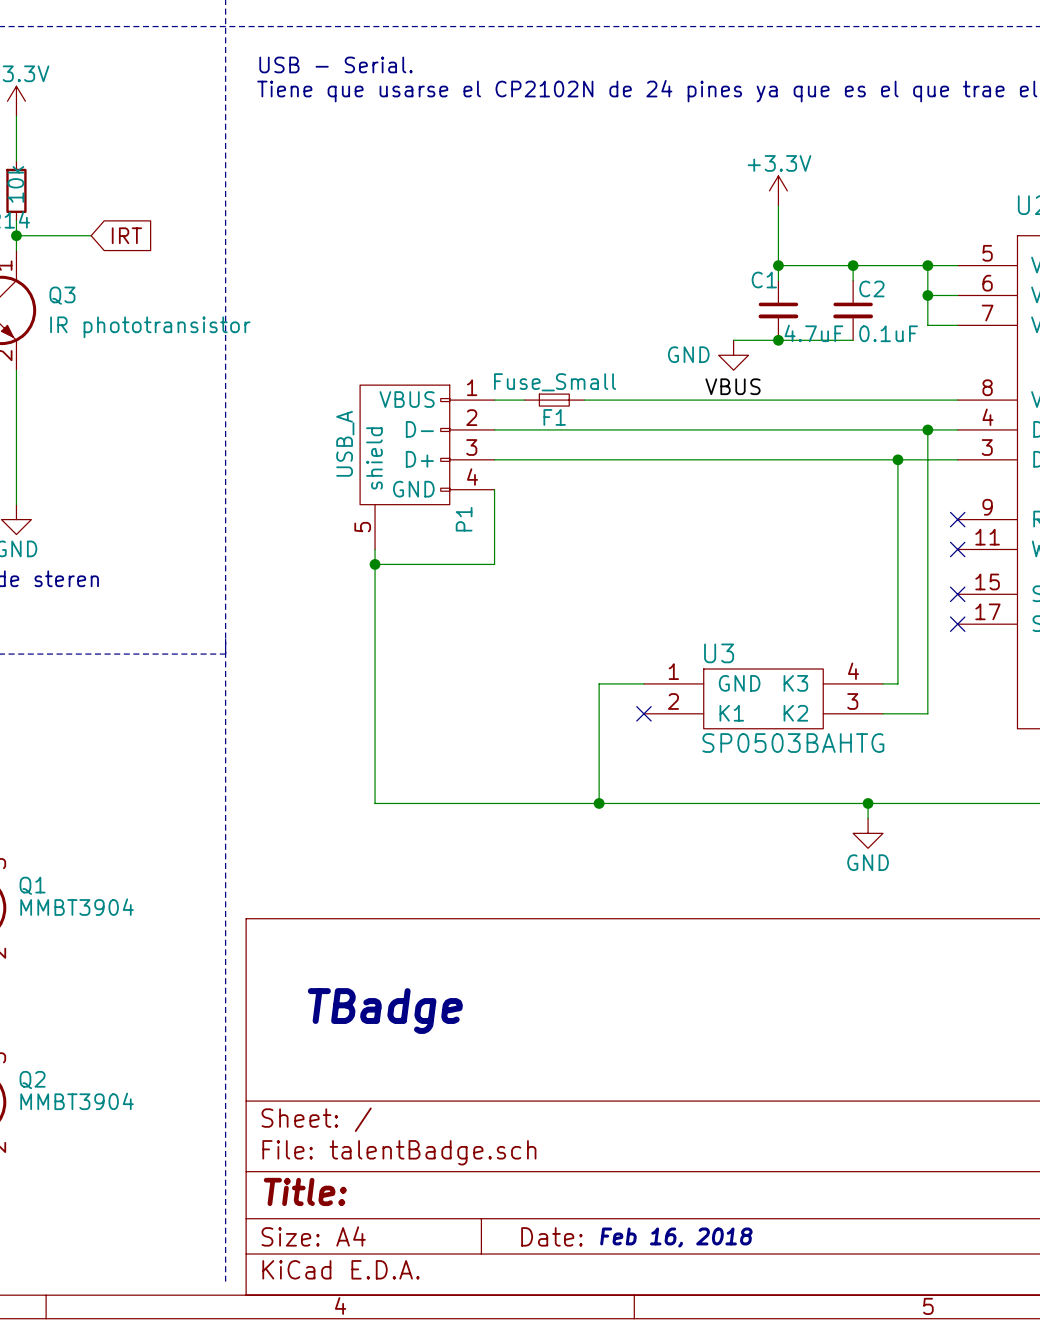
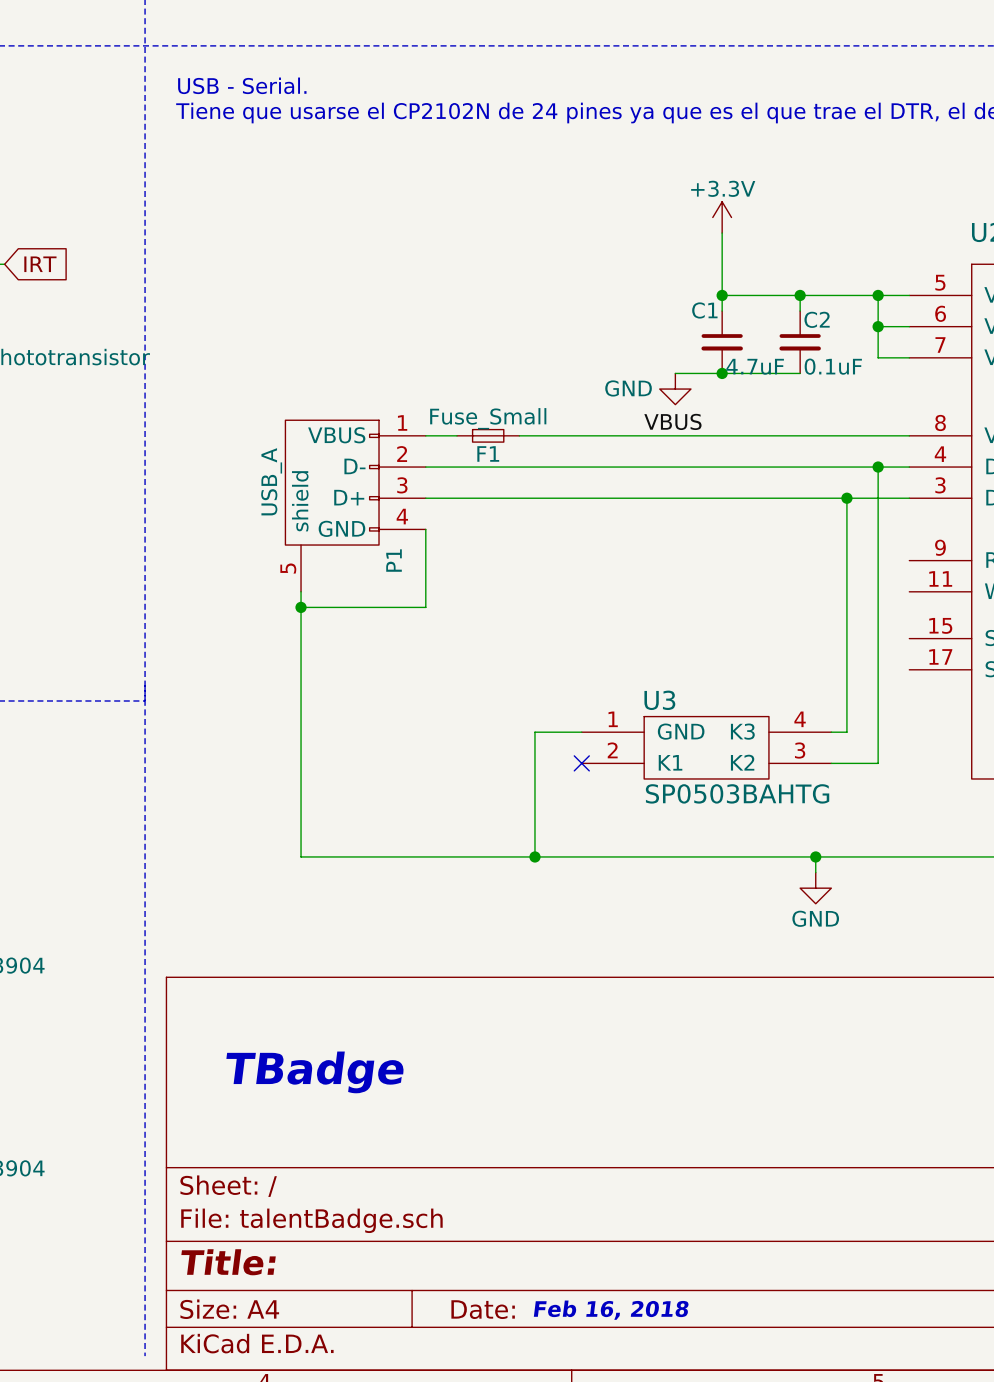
no-connect mark: (957, 519) -> none
no-connect mark: (957, 549) -> none
no-connect mark: (957, 594) -> none
no-connect mark: (957, 624) -> none

